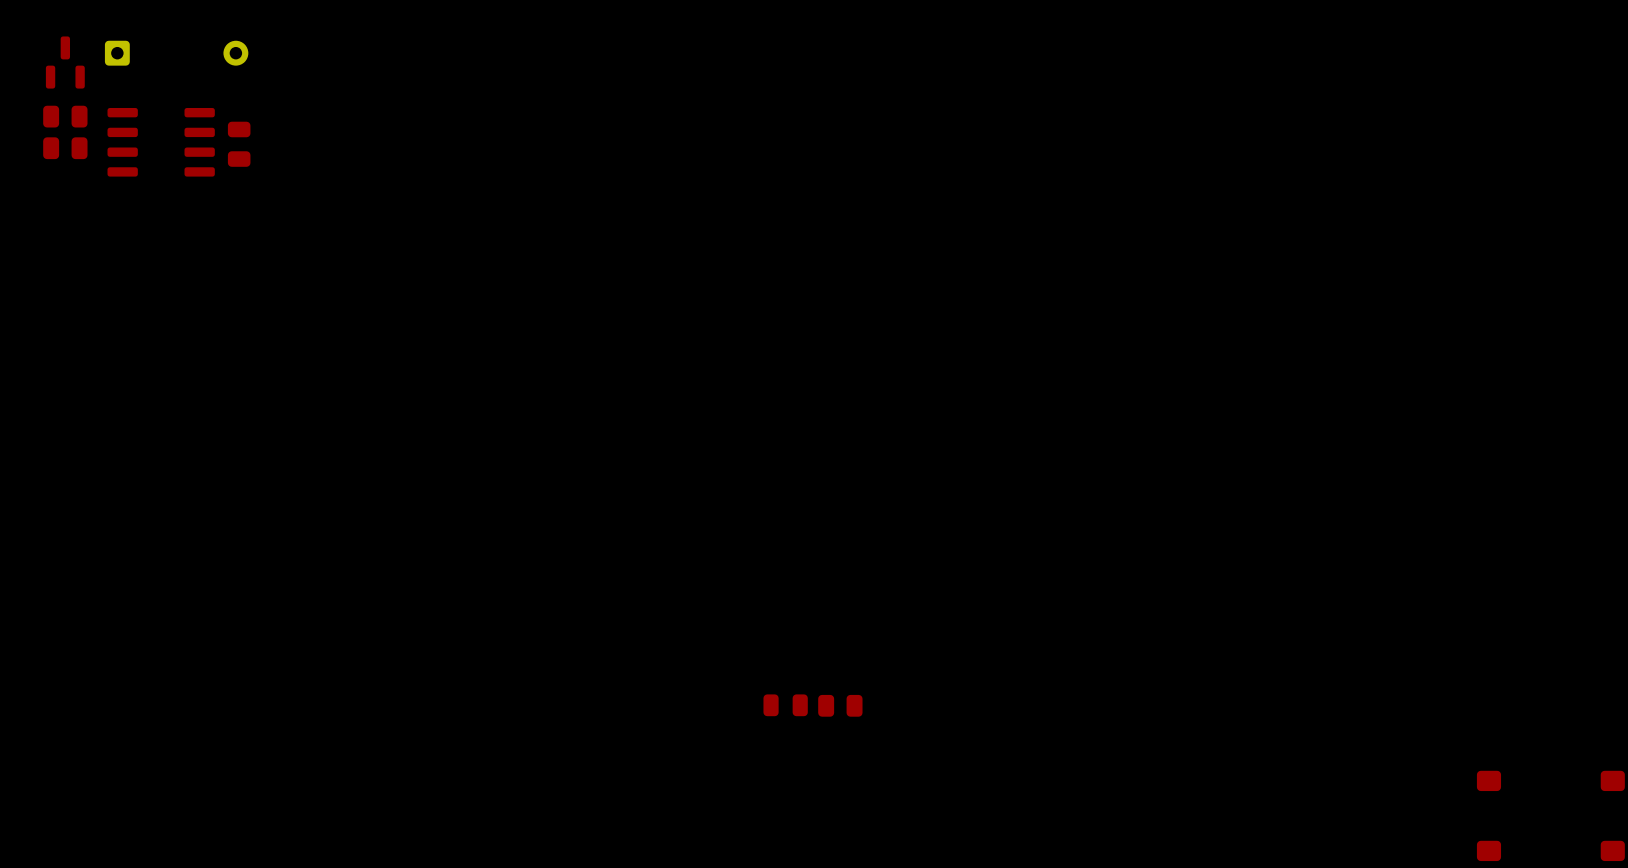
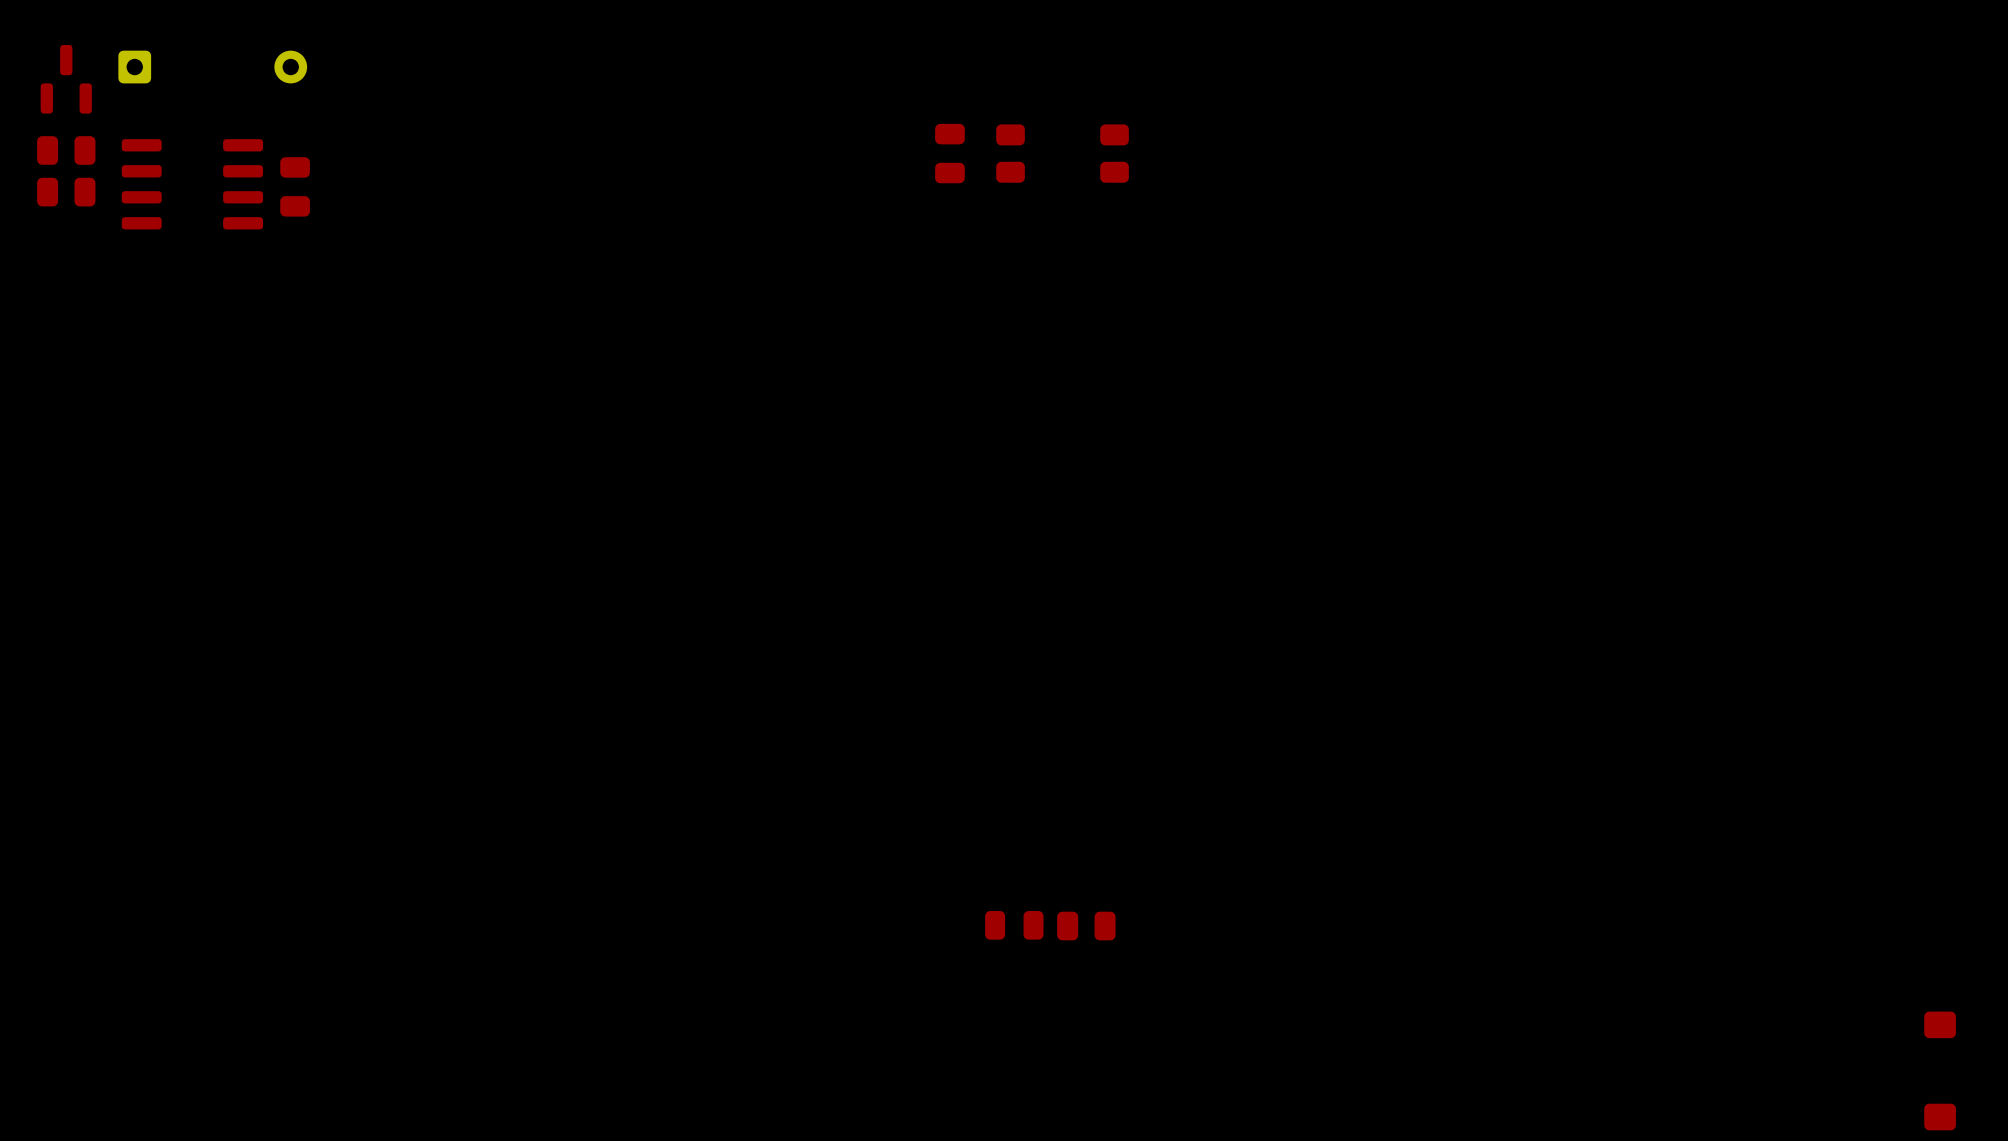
part: none -> (949, 153)
part: none -> (1010, 153)
part: none -> (1114, 153)

